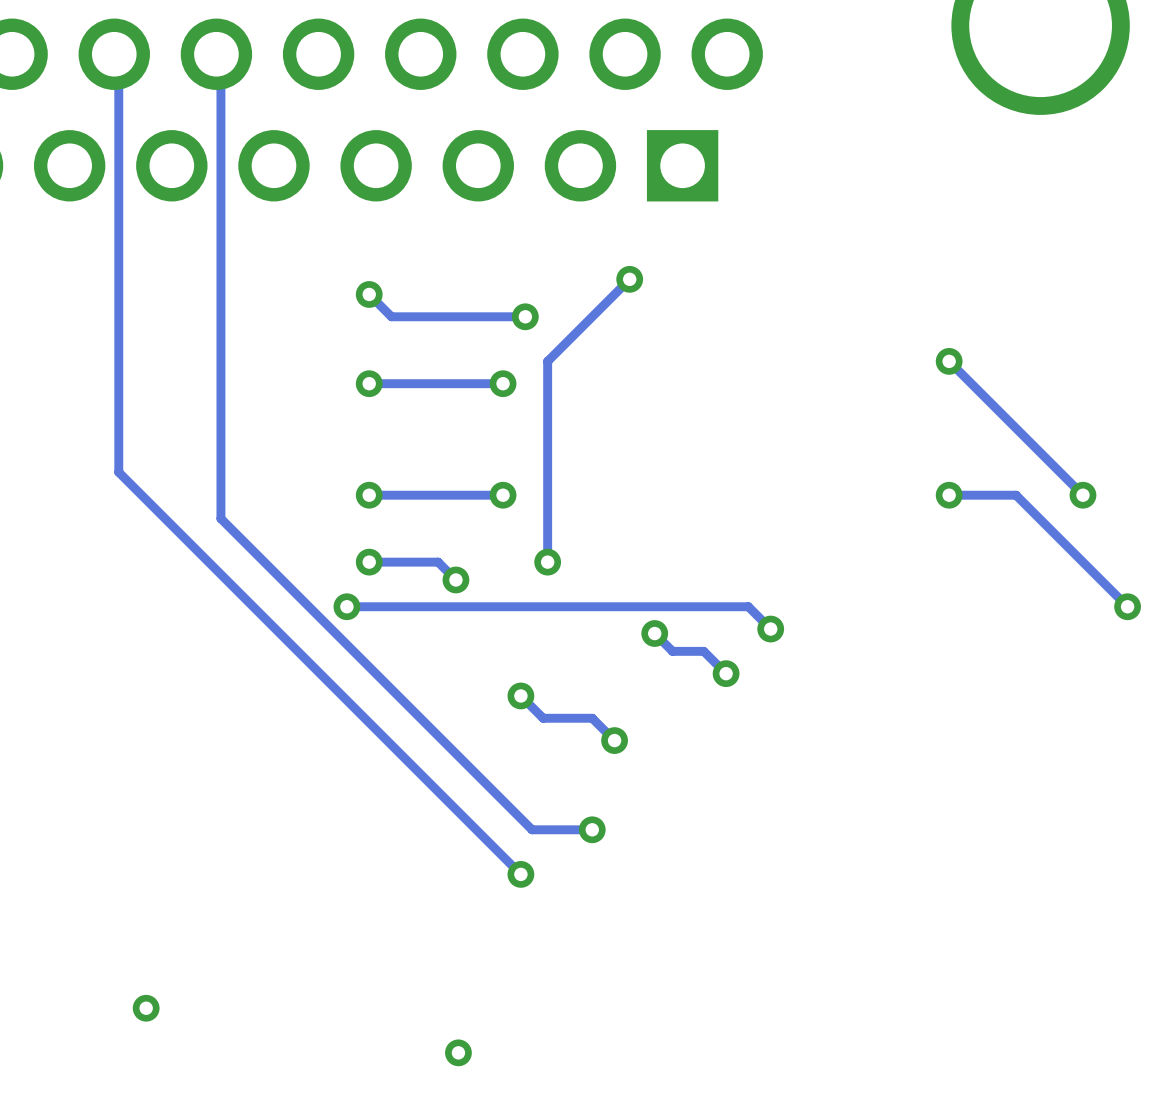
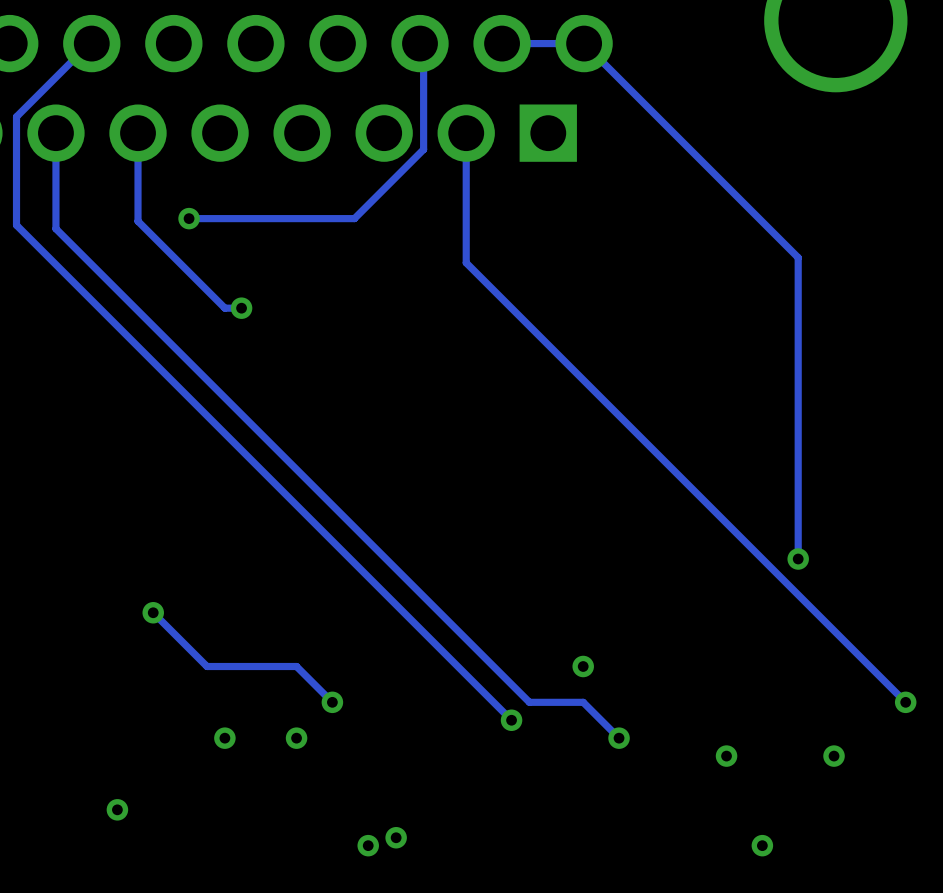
track: none -> (91, 43) (16, 116) (16, 225) (511, 720)
track: none -> (420, 43) (423, 47) (423, 149) (354, 218) (189, 218)
track: none -> (502, 43) (584, 43) (798, 257) (798, 559)
track: (118, 58) (118, 472) (520, 874) -> none
track: (220, 58) (220, 518) (532, 829) (592, 829) -> none
track: none -> (55, 133) (55, 228) (529, 702) (583, 702) (619, 738)
track: none -> (138, 133) (138, 221) (224, 308) (241, 308)
track: none -> (466, 133) (466, 262) (905, 702)
via: none -> (189, 218)
track: (629, 279) (547, 361) (547, 562) -> none
via: (629, 279) -> none
track: (369, 294) (391, 316) (525, 316) -> none
via: (369, 294) -> none
via: (525, 316) -> none
track: (949, 361) (1082, 495) -> none
via: (949, 361) -> none
via: none -> (241, 308)
via: (369, 383) -> none
track: (503, 383) (369, 383) -> none
via: (503, 383) -> none
via: (369, 495) -> none
track: (503, 495) (369, 495) -> none
via: (503, 495) -> none
track: (949, 495) (1016, 495) (1127, 606) -> none
via: (949, 495) -> none
via: (1082, 495) -> none
track: (369, 562) (438, 562) (455, 579) -> none
via: (369, 562) -> none
via: (547, 562) -> none
via: (455, 579) -> none
track: (346, 606) (748, 606) (770, 629) -> none
via: (346, 606) -> none
via: (1127, 606) -> none
via: (770, 629) -> none
track: (654, 633) (672, 651) (703, 651) (726, 673) -> none
via: (654, 633) -> none
via: (726, 673) -> none
track: (520, 695) (543, 718) (592, 718) (614, 740) -> none
via: (520, 695) -> none
via: none -> (798, 559)
via: (614, 740) -> none
track: none -> (153, 612) (206, 666) (296, 666) (332, 702)
via: none -> (153, 612)
via: (592, 829) -> none
via: none -> (583, 666)
via: none -> (332, 702)
via: (520, 874) -> none
via: none -> (905, 702)
via: none -> (511, 720)
via: none -> (224, 738)
via: none -> (296, 738)
via: none -> (619, 738)
via: none -> (726, 756)
via: none -> (834, 756)
via: none -> (396, 837)
via: none -> (762, 845)

